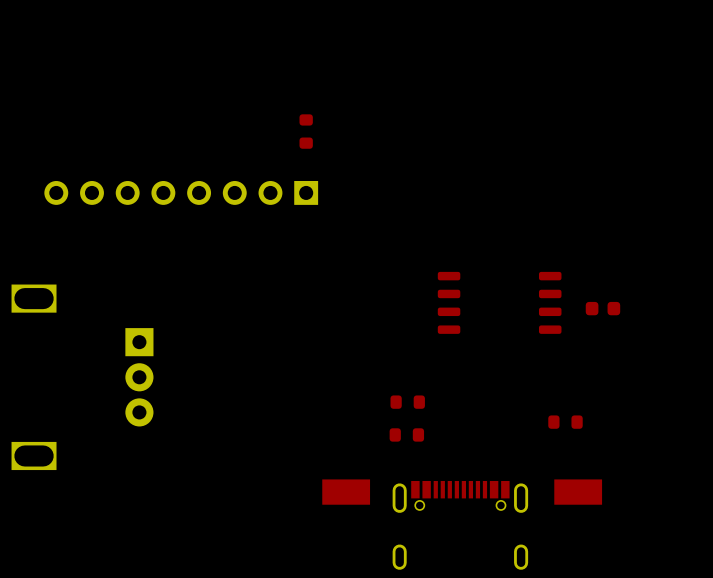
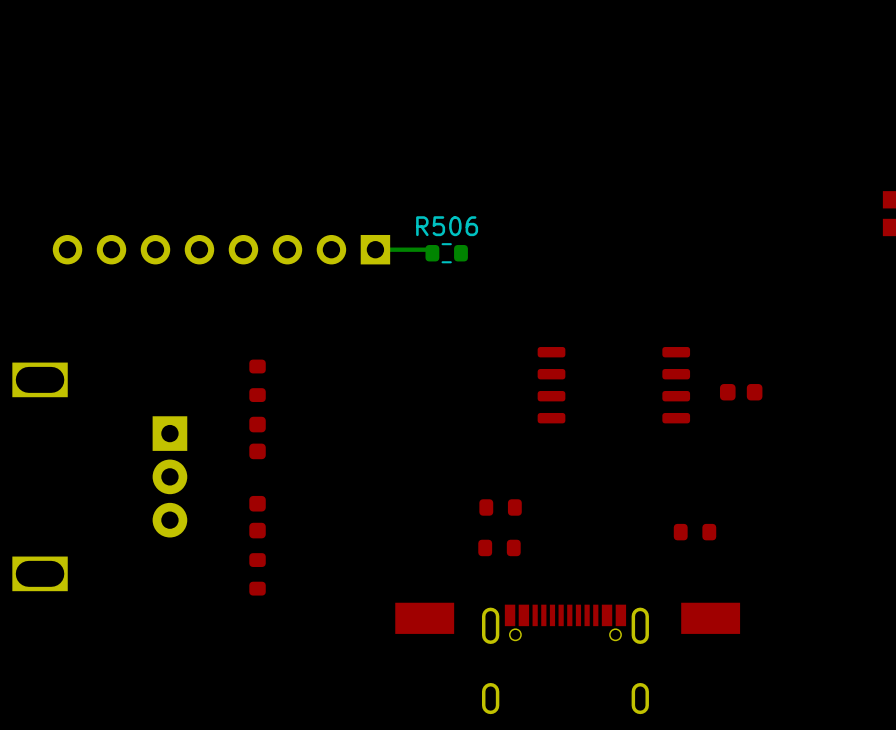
R506 side: top (306, 131) -> bottom (446, 253)
bottom track: none -> (375, 249) (428, 249) (432, 253)
part: none -> (257, 380)
part: none -> (257, 437)
part: none -> (257, 517)
part: none -> (257, 574)

